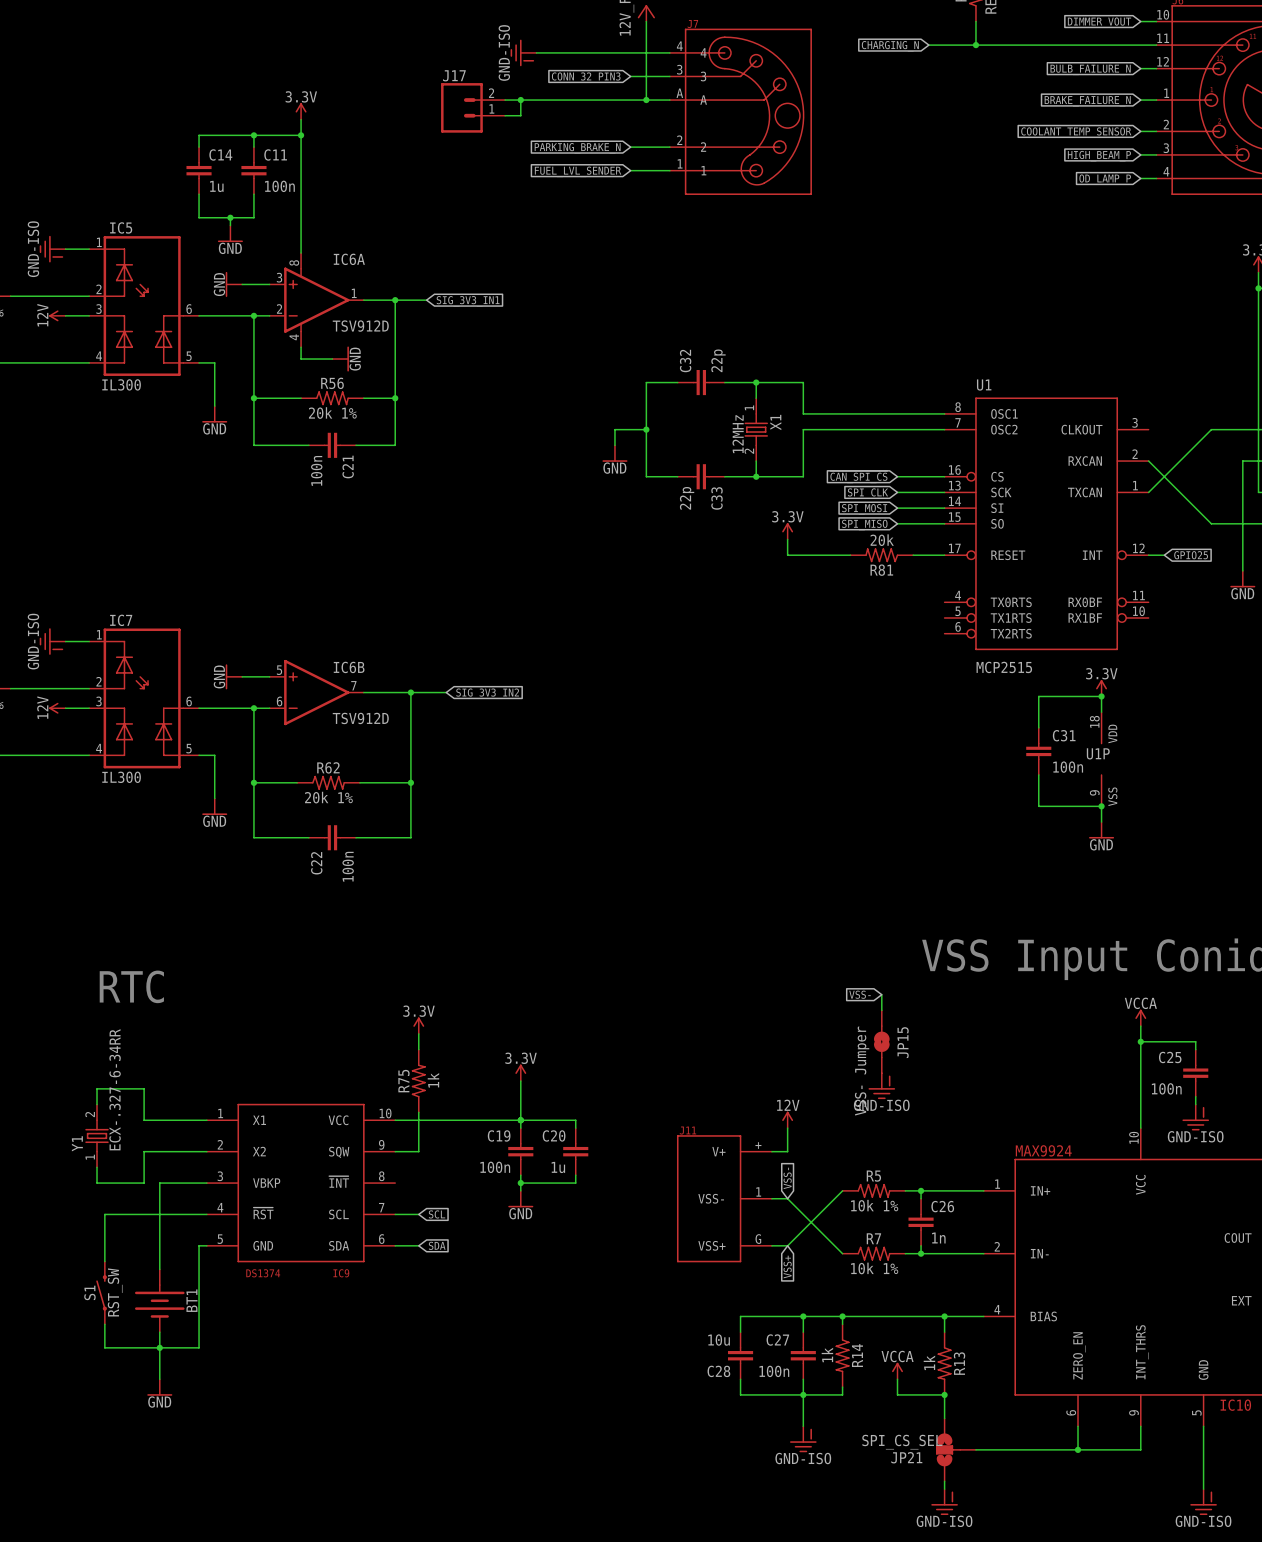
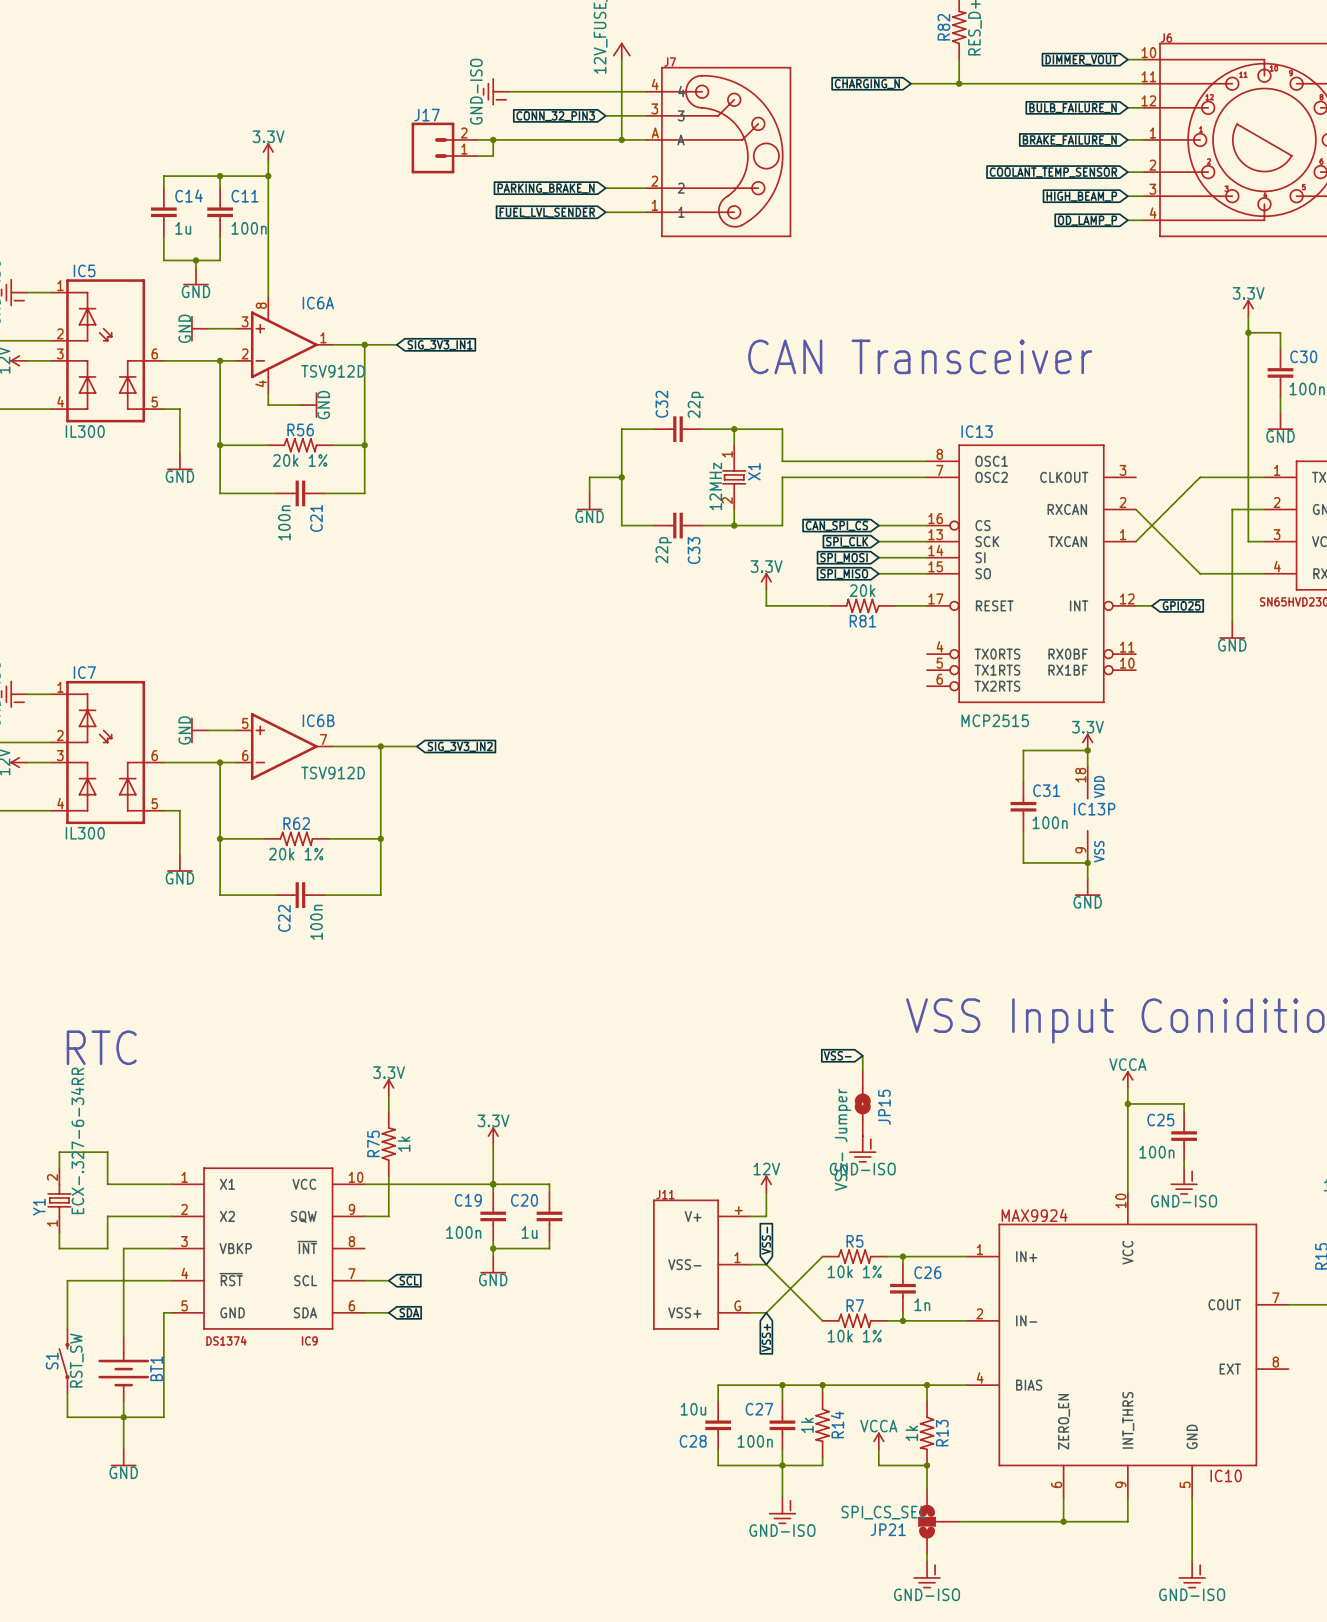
text: none -> CAN Transceiver (920, 356)
U1 name: U1 (984, 385) -> IC13 (977, 431)
U1P name: U1P (1098, 753) -> IC13P (1094, 809)

